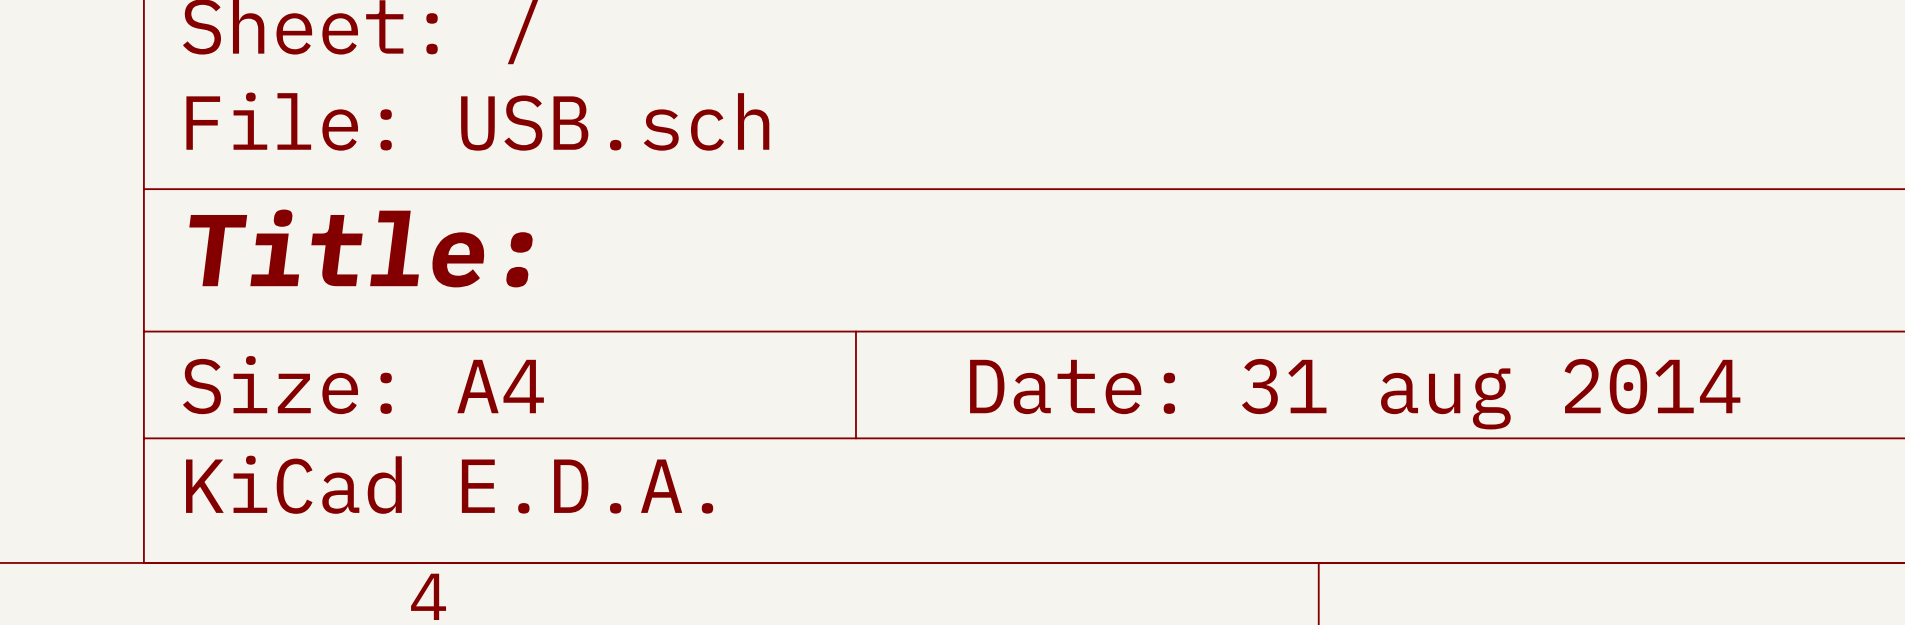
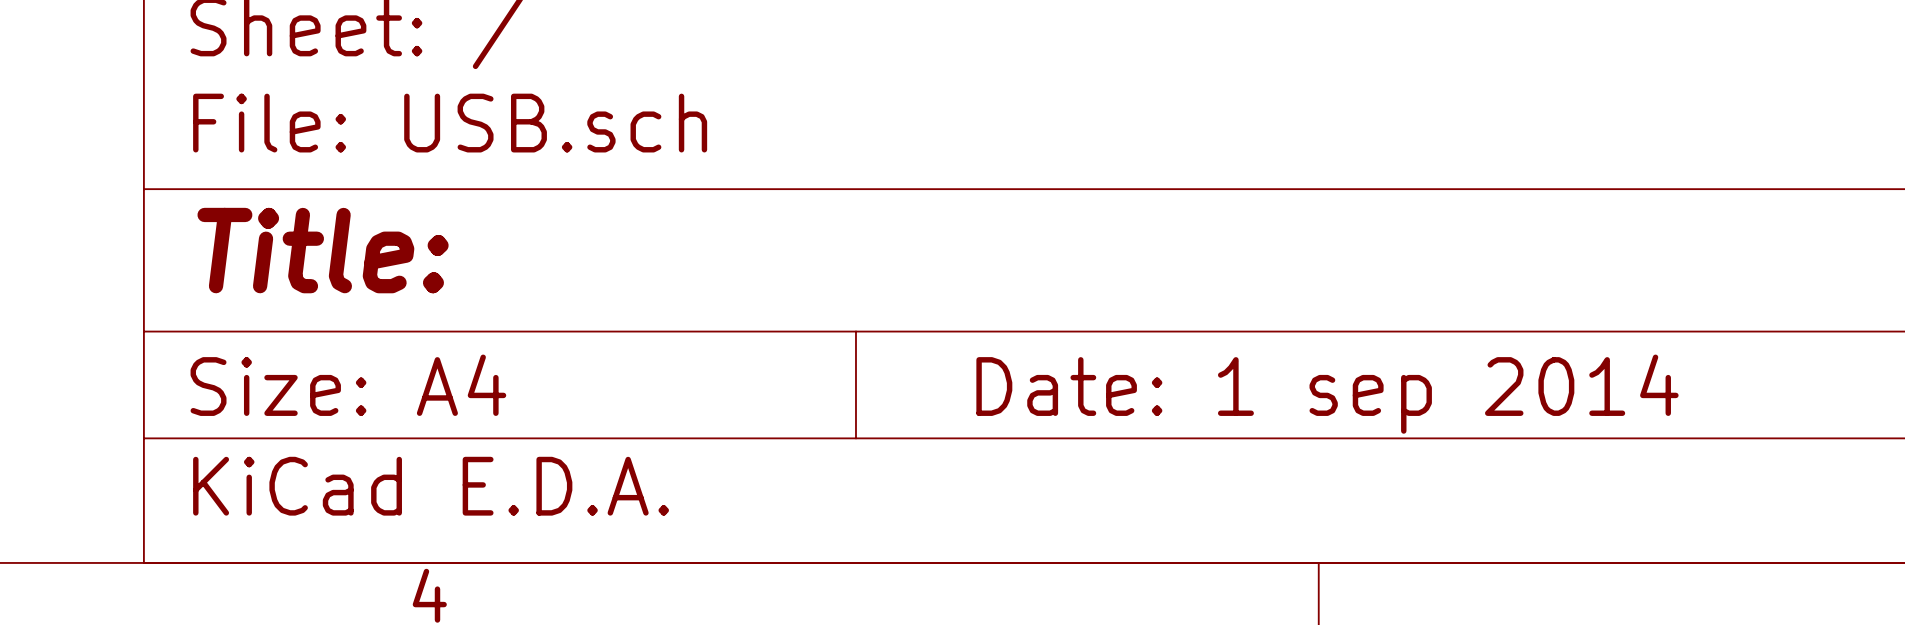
title block: Date: 31 aug 2014 (1355, 394) -> Date: 1 sep 2014 (1327, 394)

